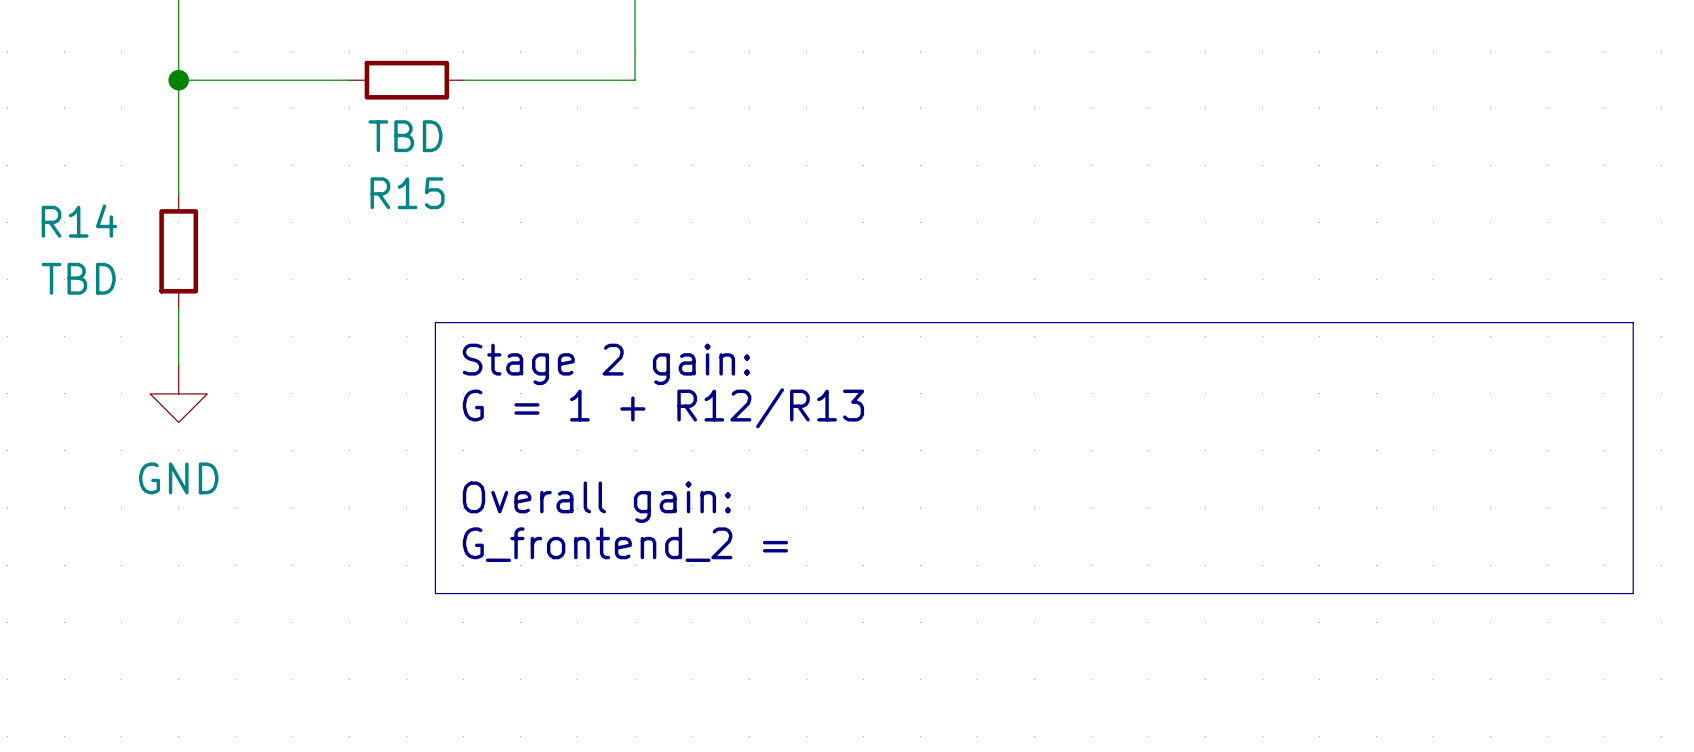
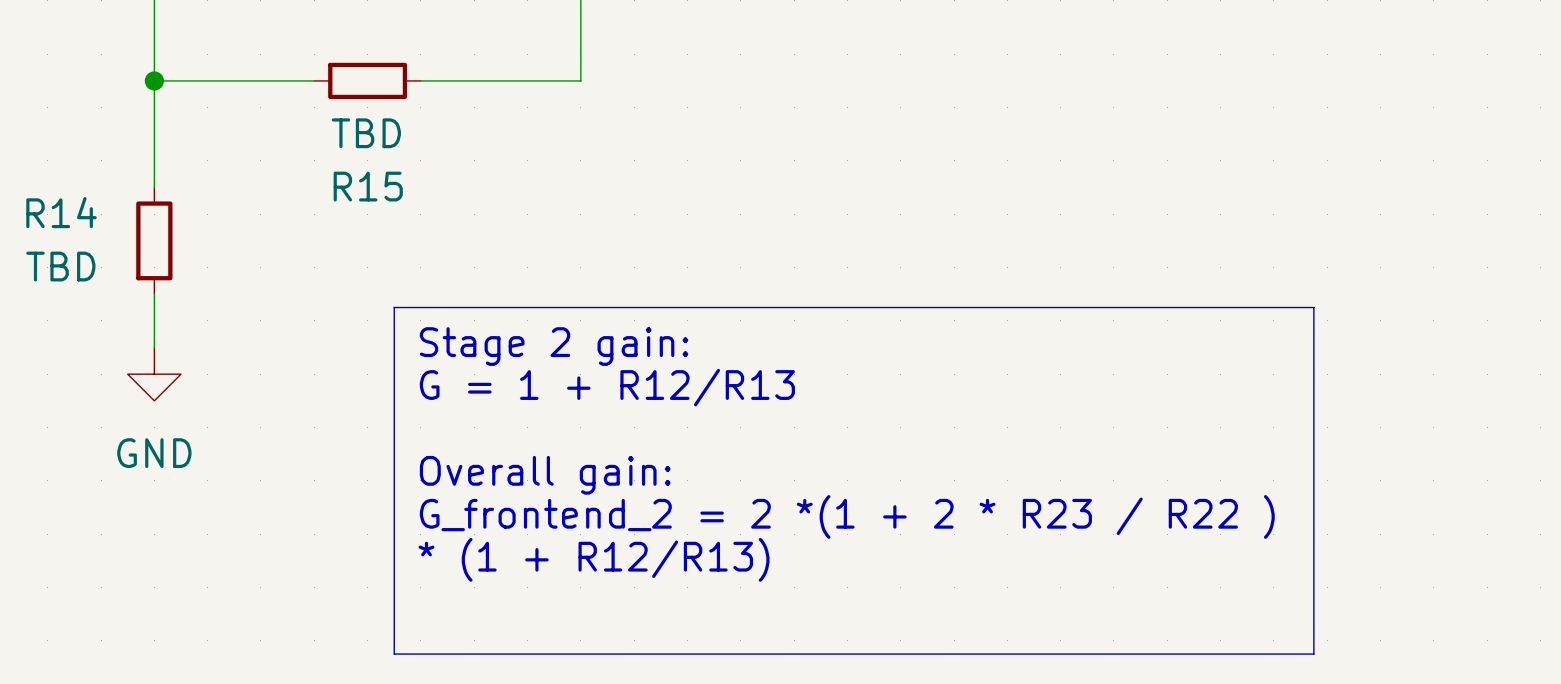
line: (1419, 322) (1633, 322) (1633, 593) (435, 593) -> (1313, 307) (1313, 654) (394, 654) (394, 560)
text: G_frontend_2 = (625, 544) -> G_frontend_2 = 2 *(1 + 2 * R23 / R22 ) (847, 516)
text: none -> * (1 + R12/R13) (594, 559)

